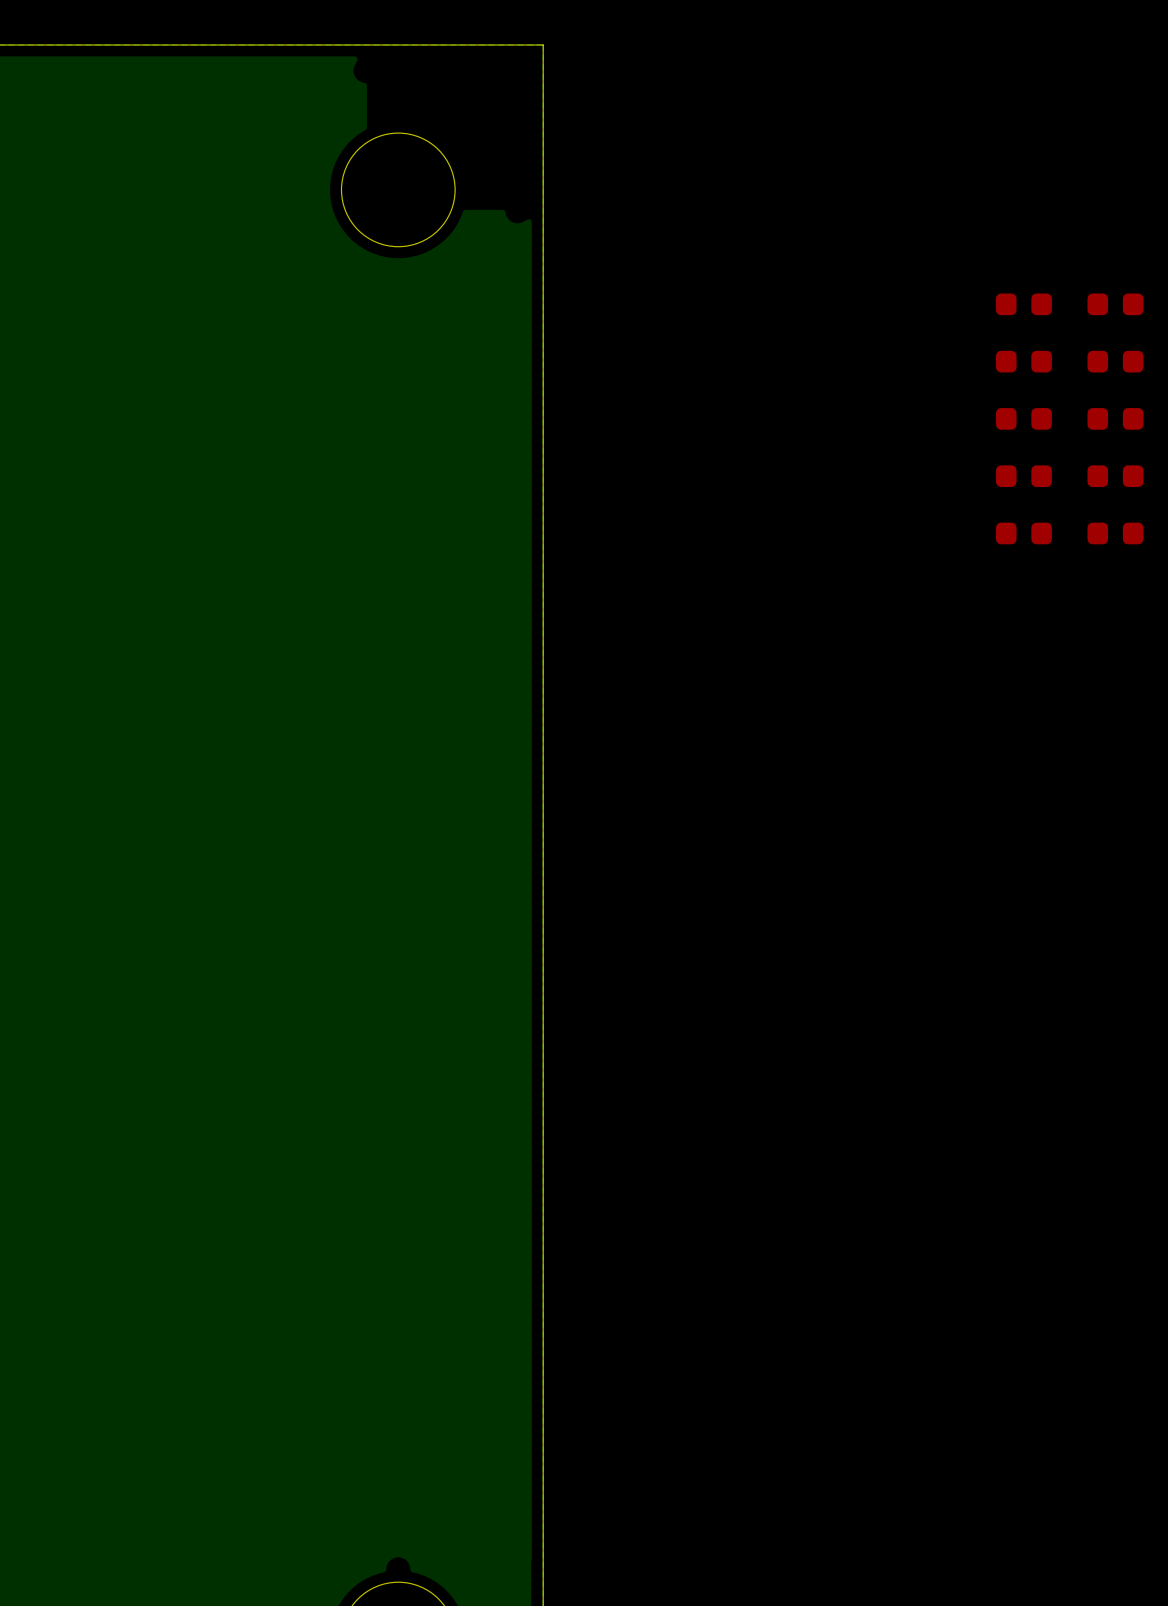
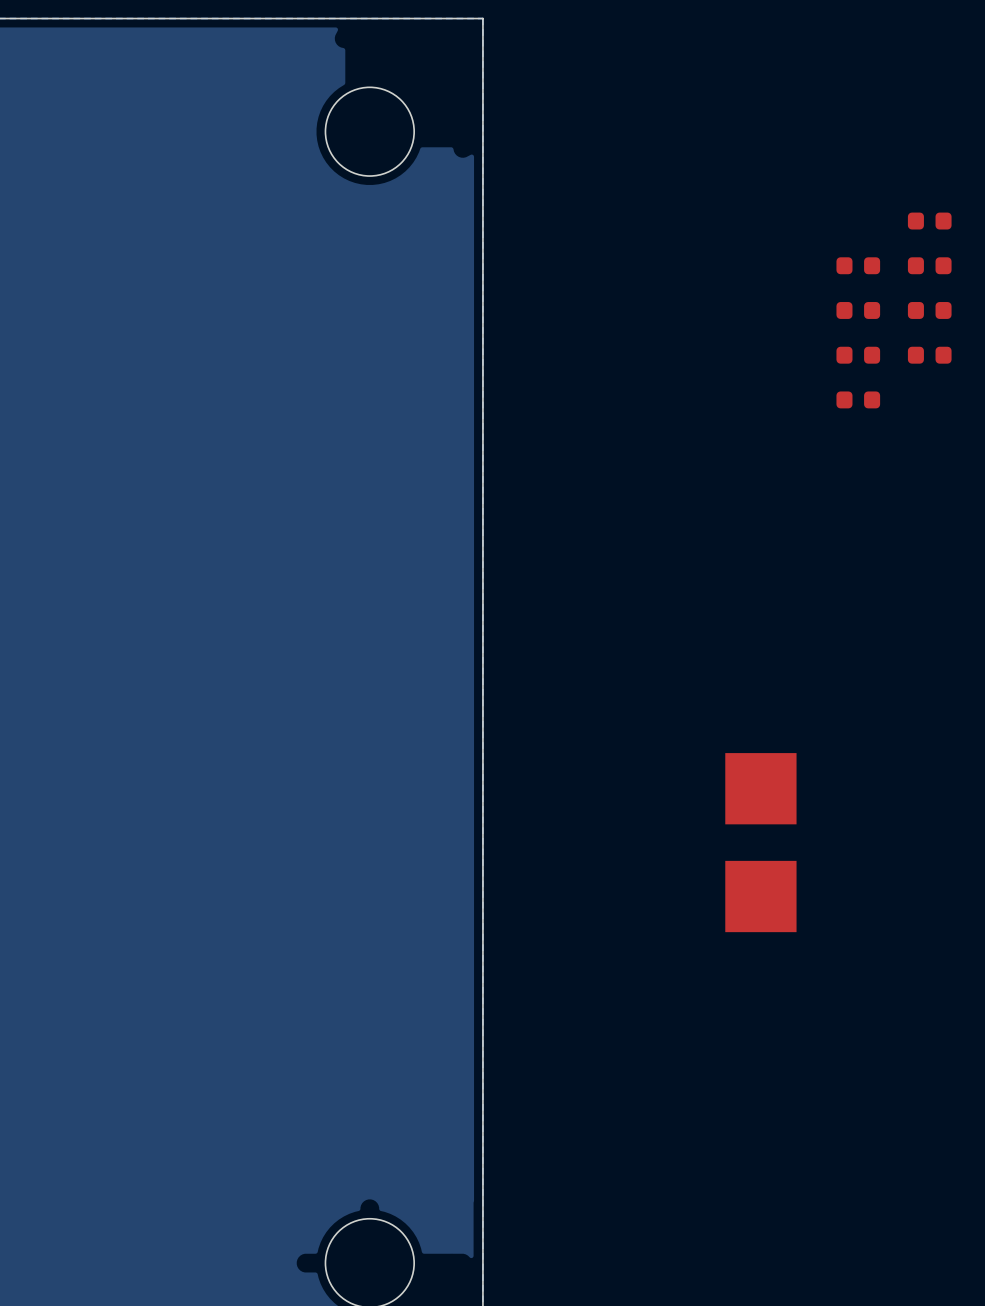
part: (1023, 304) -> none
part: (1115, 533) -> none
part: none -> (760, 788)
part: none -> (760, 896)

